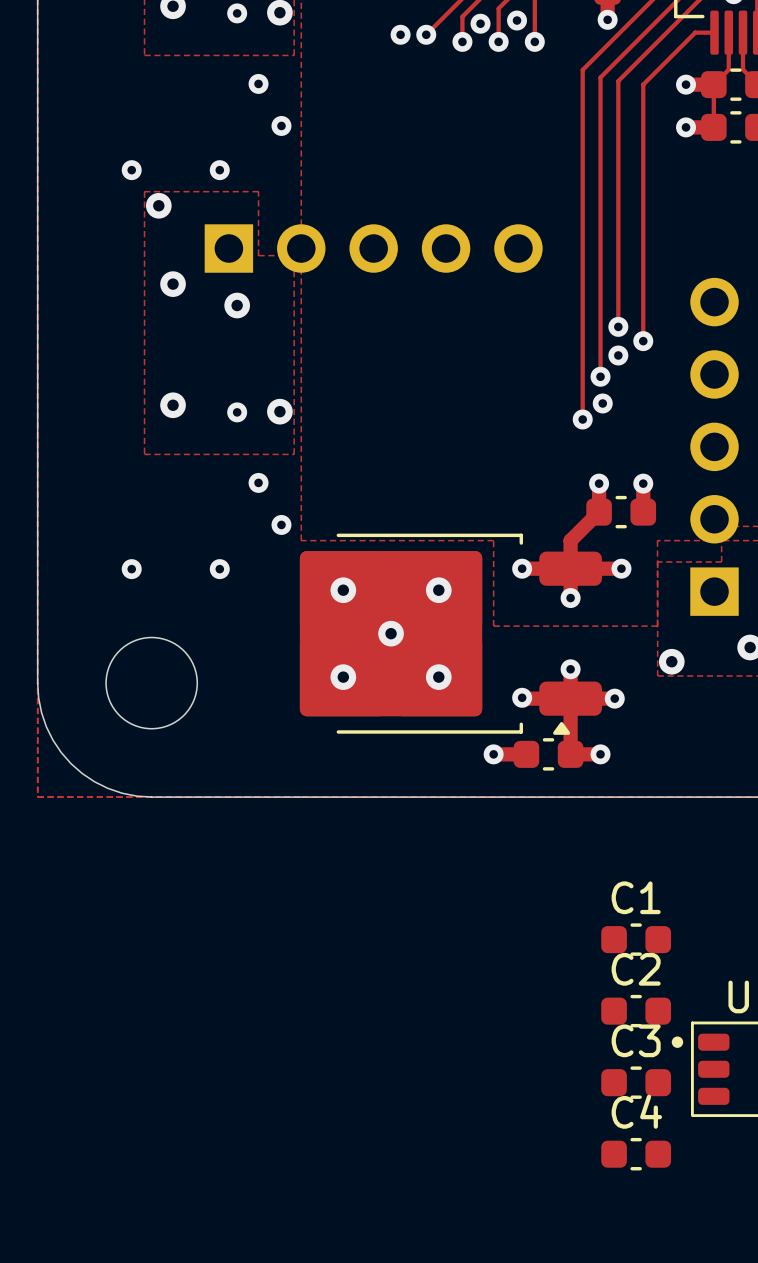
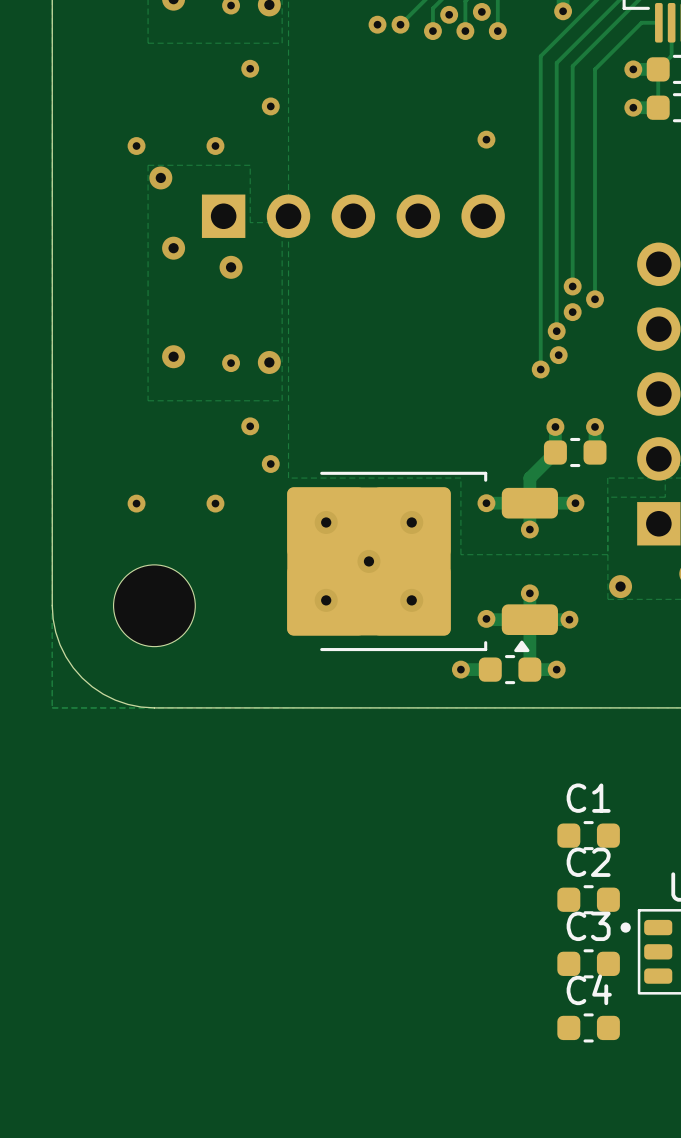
via: none -> (486, 139)

